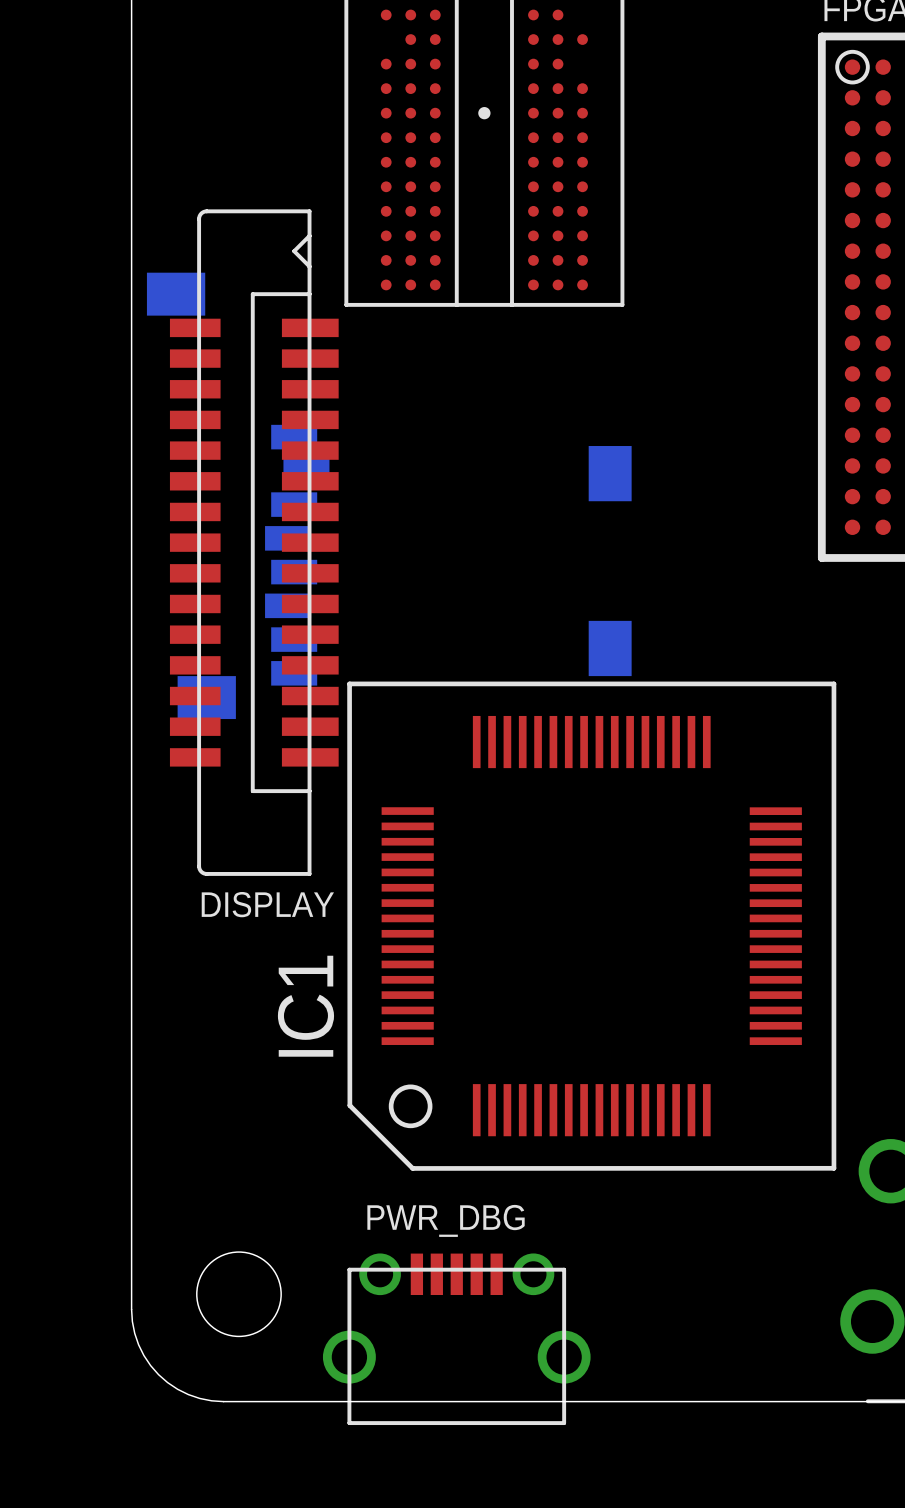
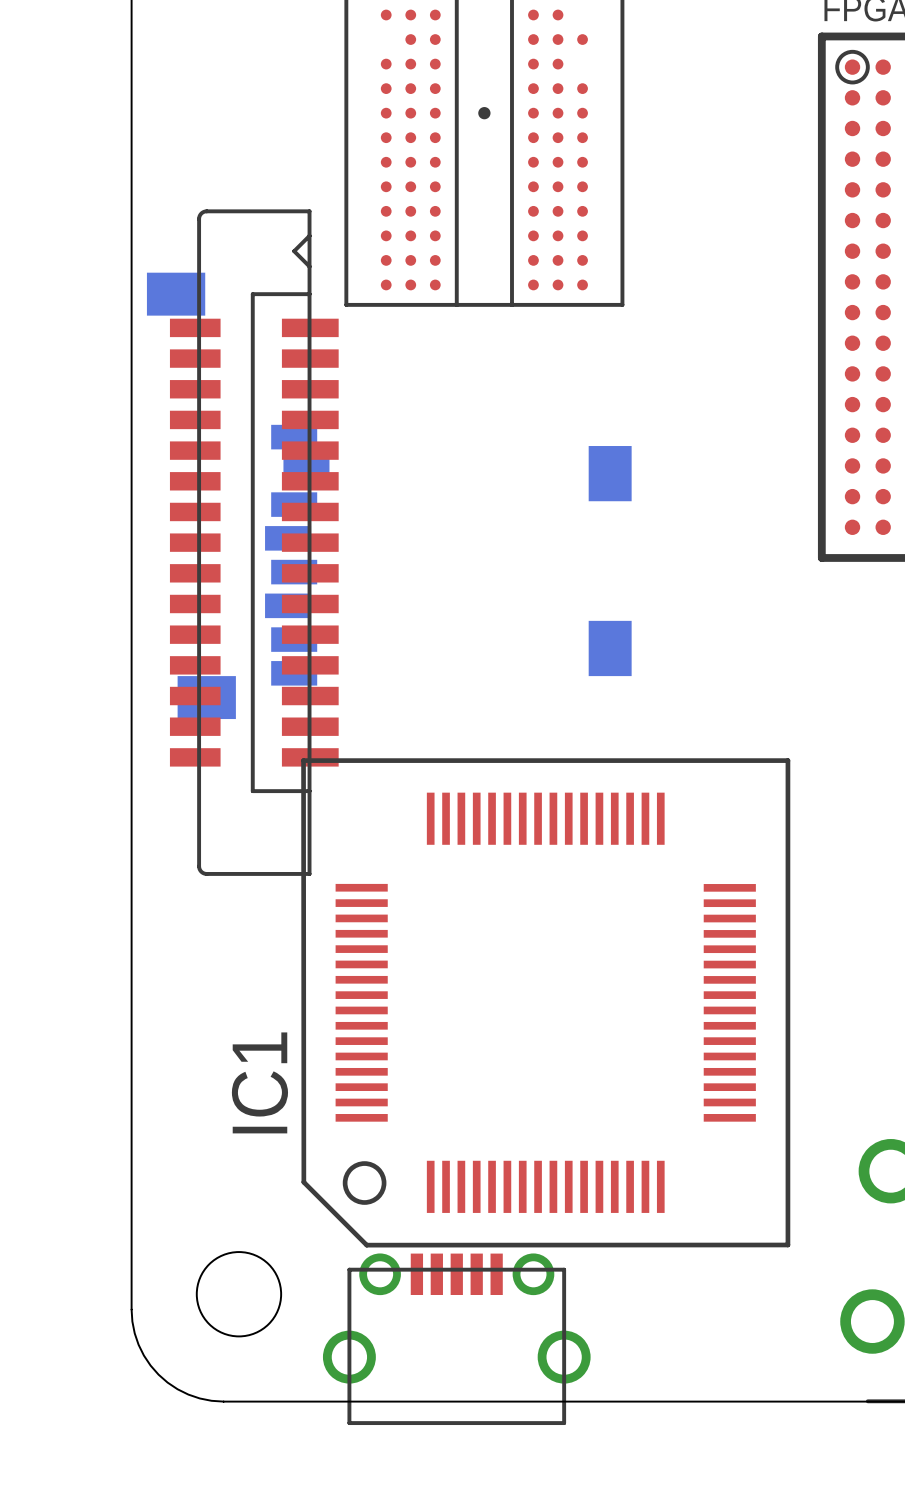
DISPLAY name: DISPLAY (267, 904) -> none
IC1 position: (591, 926) -> (545, 1002)
PWR_DBG name: PWR_DBG (446, 1220) -> none

